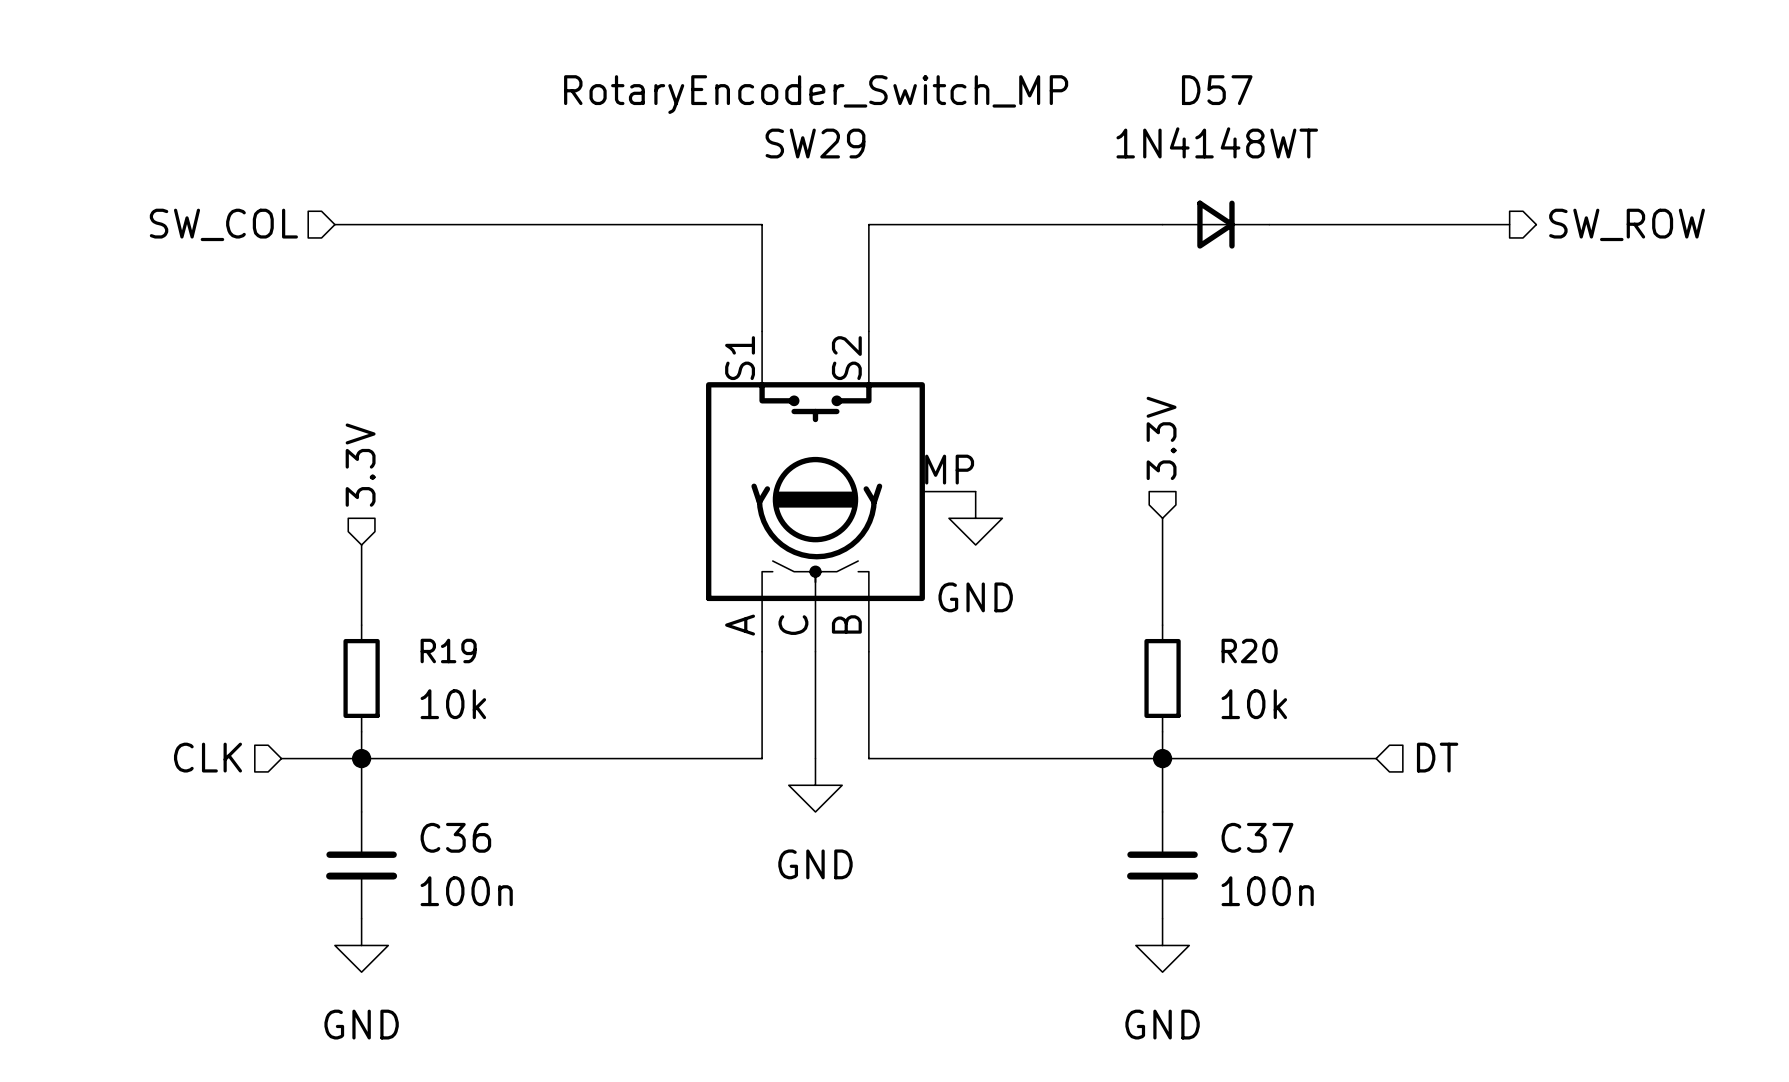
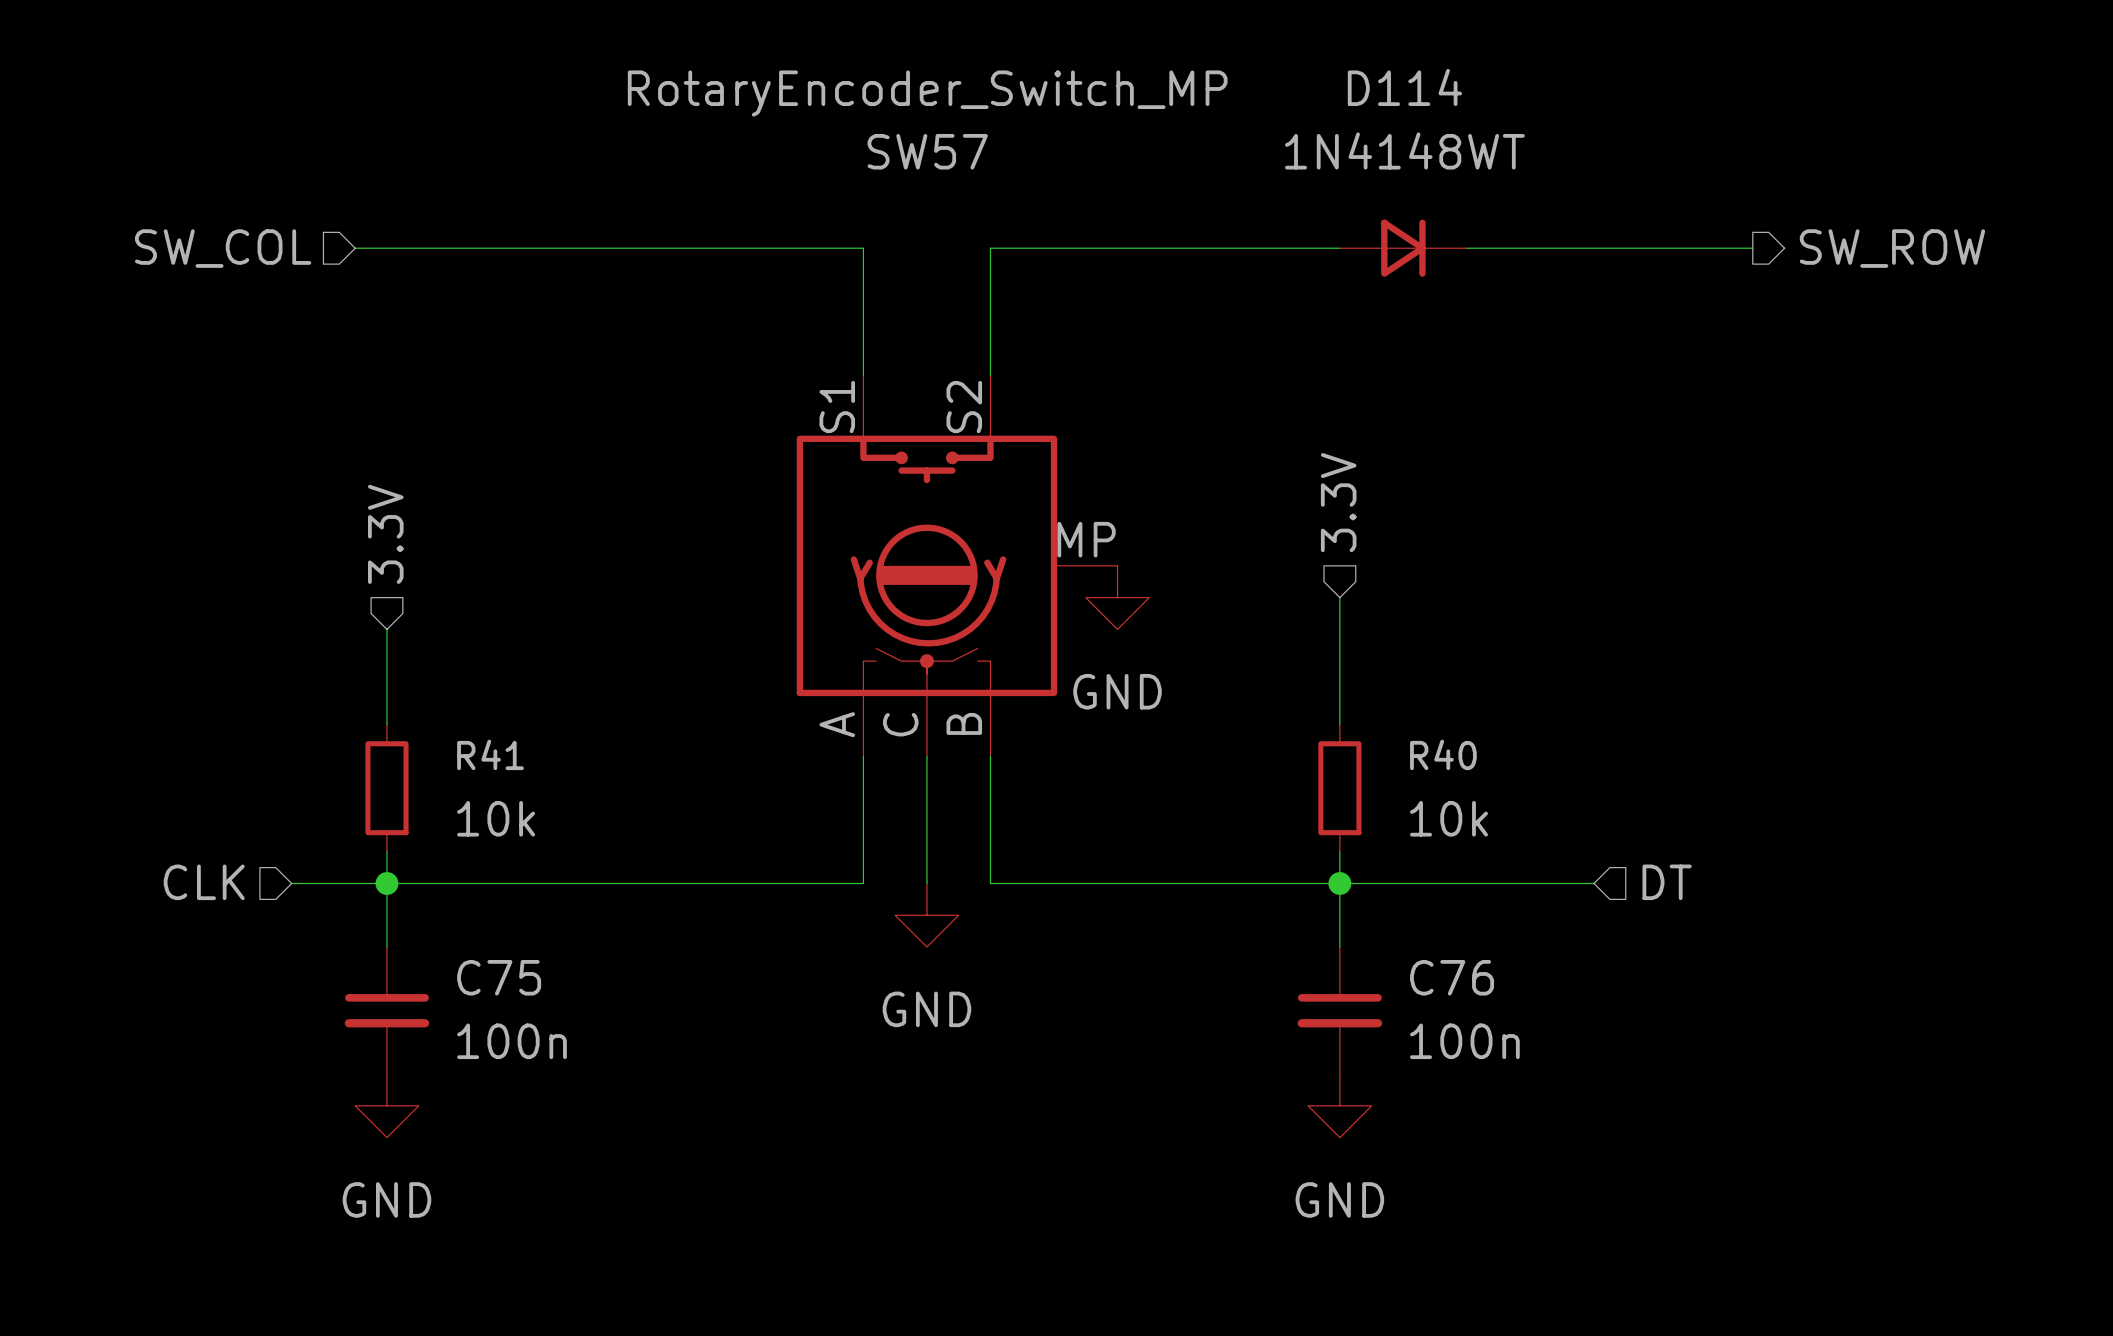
D57 name: D57 (1217, 90) -> D114 (1404, 87)
SW29 name: SW29 (815, 143) -> SW57 (927, 151)
R19 name: R19 (448, 650) -> R41 (490, 754)
R20 name: R20 (1249, 650) -> R40 (1443, 754)
C36 name: C36 (455, 837) -> C75 (499, 977)
C37 name: C37 (1257, 837) -> C76 (1452, 977)

